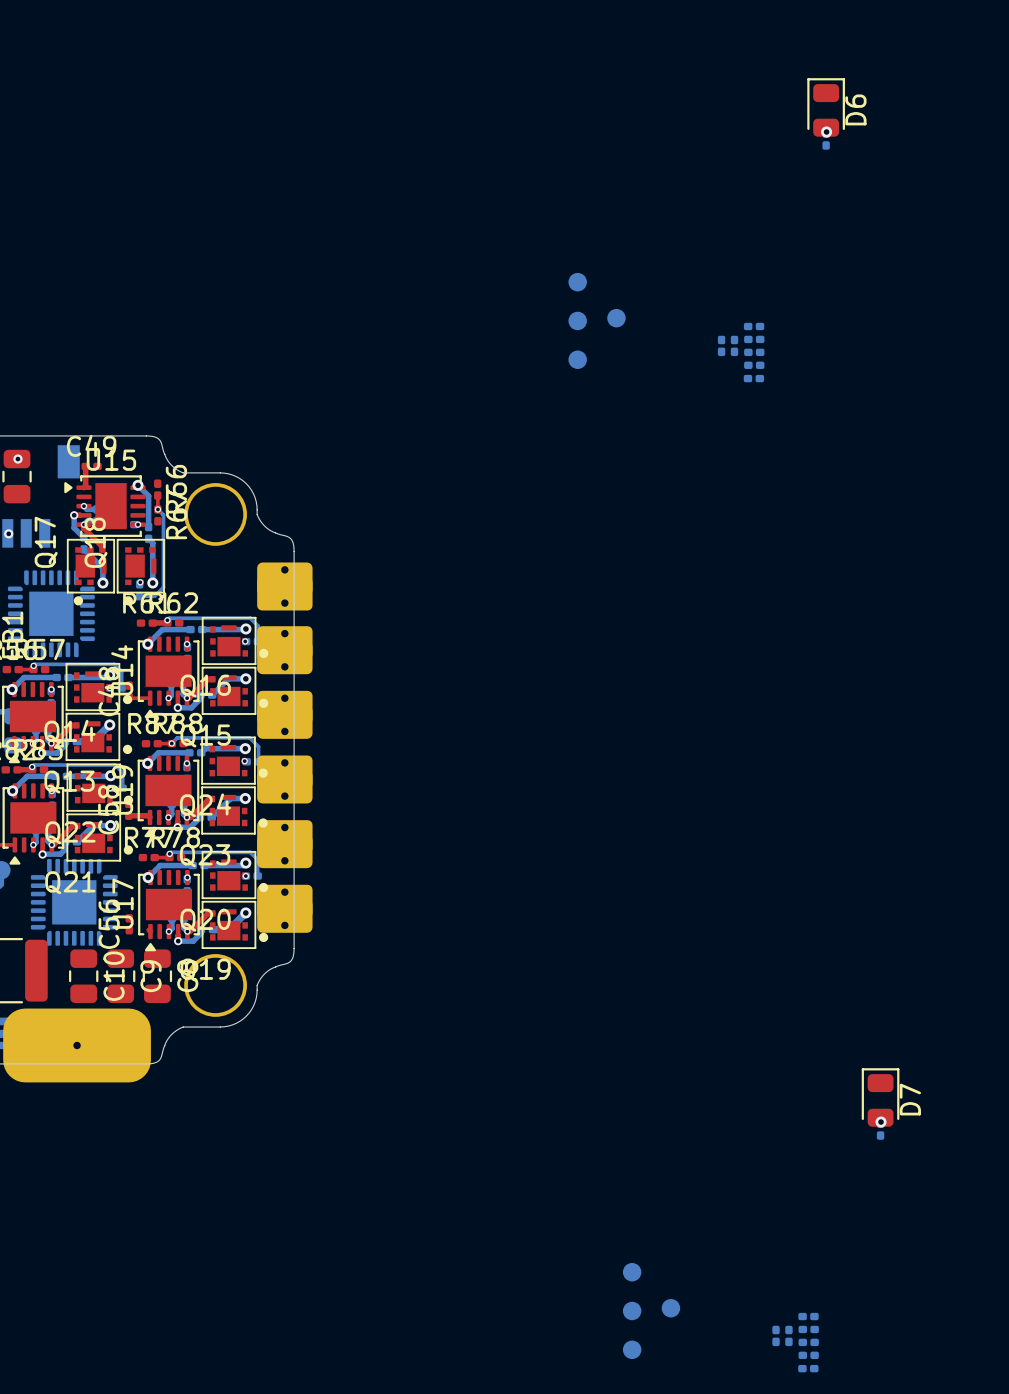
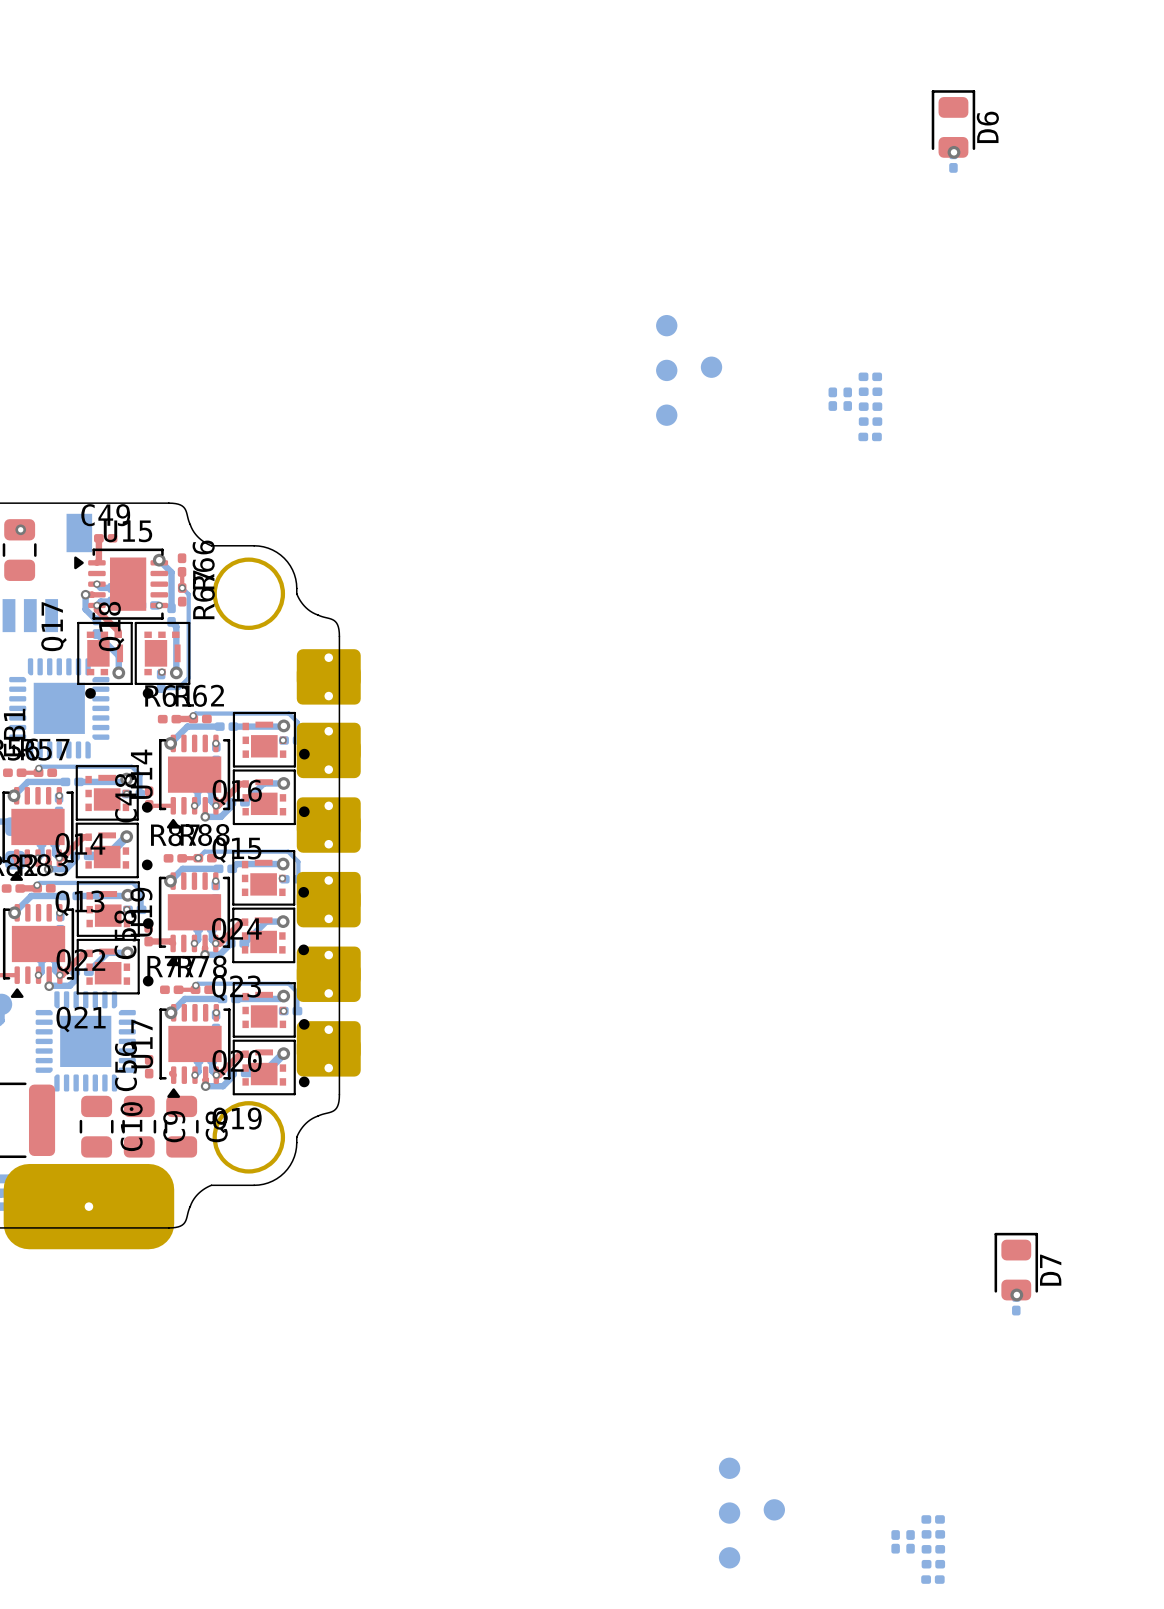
via: (8, 533) -> none

